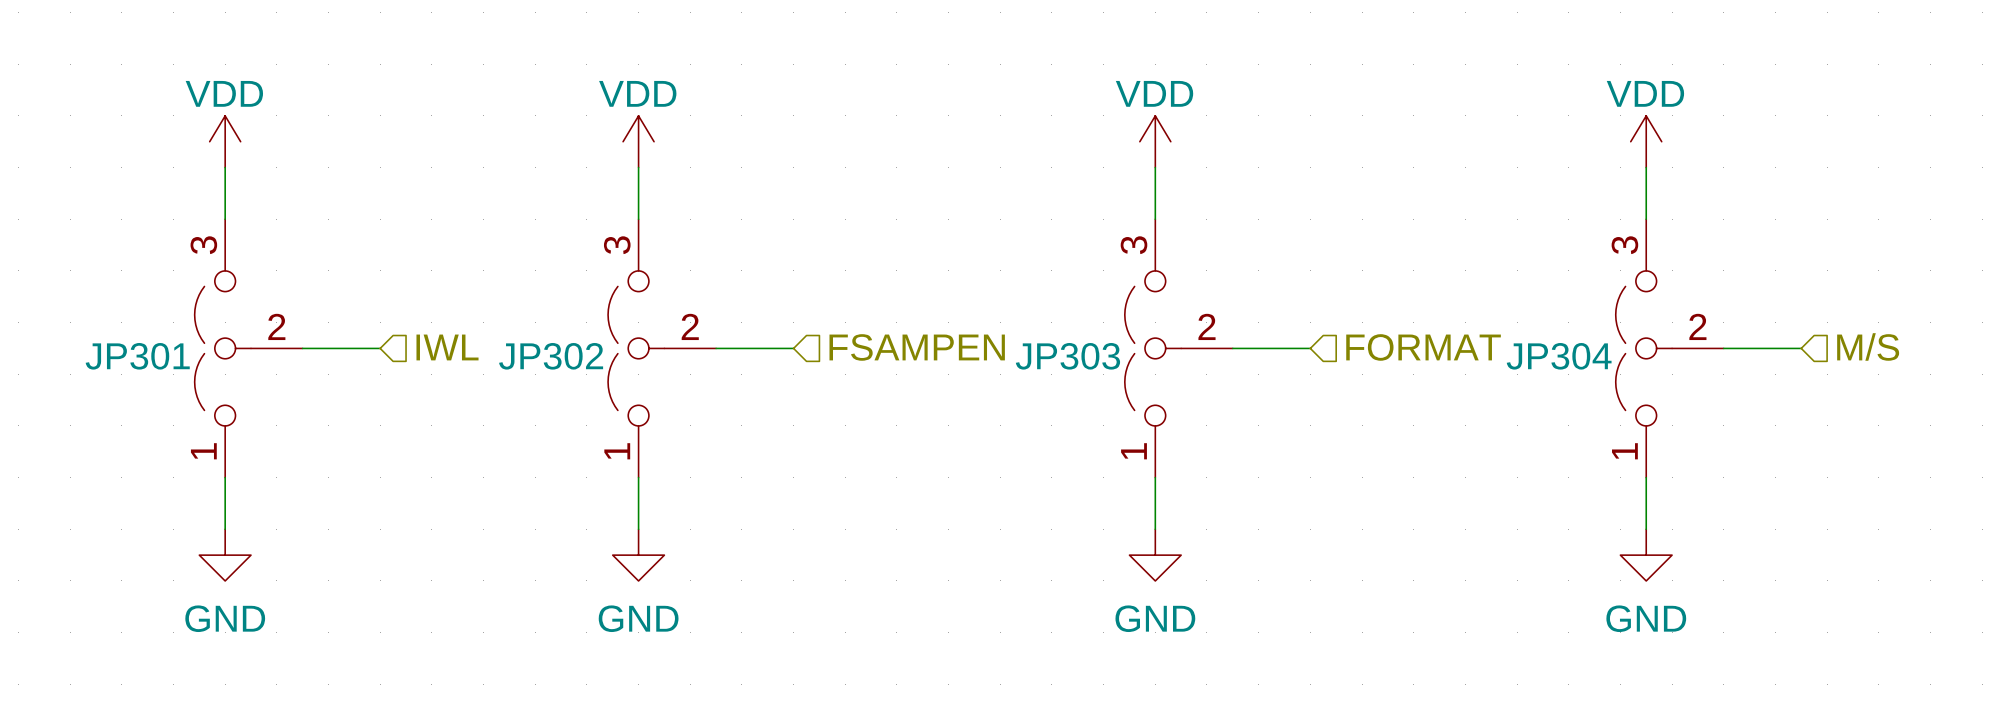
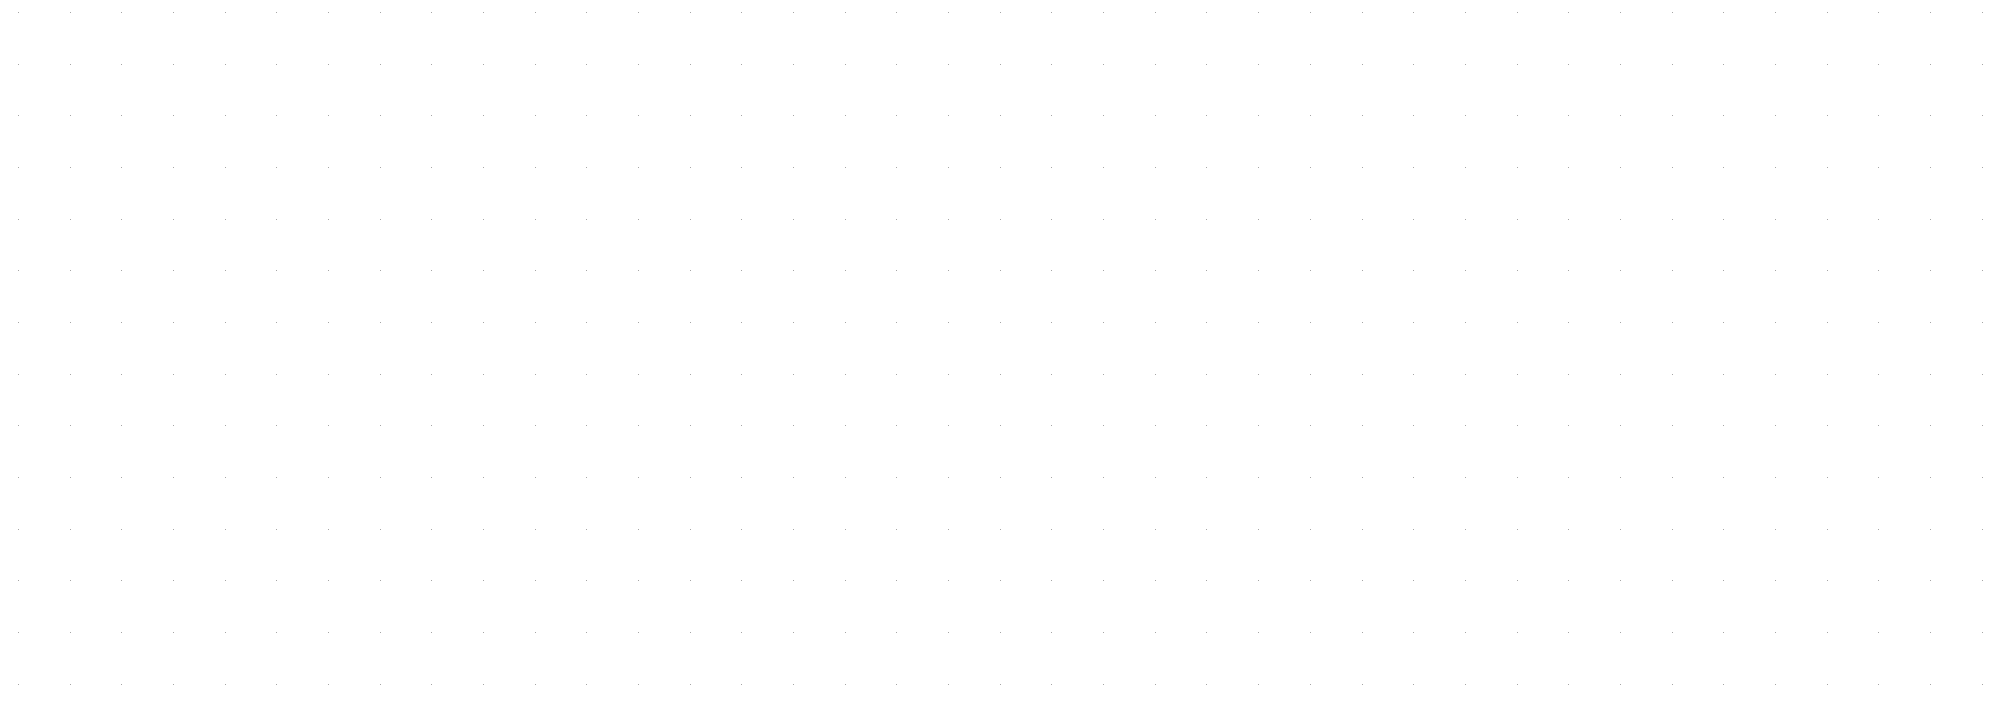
power symbol: VDD (225, 141) -> none
power symbol: VDD (638, 141) -> none
power symbol: VDD (1155, 141) -> none
power symbol: VDD (1646, 141) -> none
wire: (225, 167) (225, 219) -> none
wire: (638, 167) (638, 219) -> none
wire: (1155, 167) (1155, 219) -> none
wire: (1646, 167) (1646, 219) -> none
hierarchical label: M/S (1868, 346) -> none
hierarchical label: IWL (447, 347) -> none
hierarchical label: FSAMPEN (917, 347) -> none
hierarchical label: FORMAT (1423, 347) -> none
JP301: (248, 348) -> none
wire: (302, 348) (380, 348) -> none
JP302: (662, 348) -> none
wire: (716, 348) (793, 348) -> none
JP303: (1178, 348) -> none
wire: (1232, 348) (1310, 348) -> none
JP304: (1669, 348) -> none
wire: (1723, 348) (1801, 348) -> none
wire: (225, 477) (225, 529) -> none
wire: (638, 477) (638, 529) -> none
wire: (1155, 477) (1155, 529) -> none
wire: (1646, 477) (1646, 529) -> none
power symbol: GND (225, 555) -> none
power symbol: GND (638, 555) -> none
power symbol: GND (1155, 555) -> none
power symbol: GND (1646, 555) -> none

